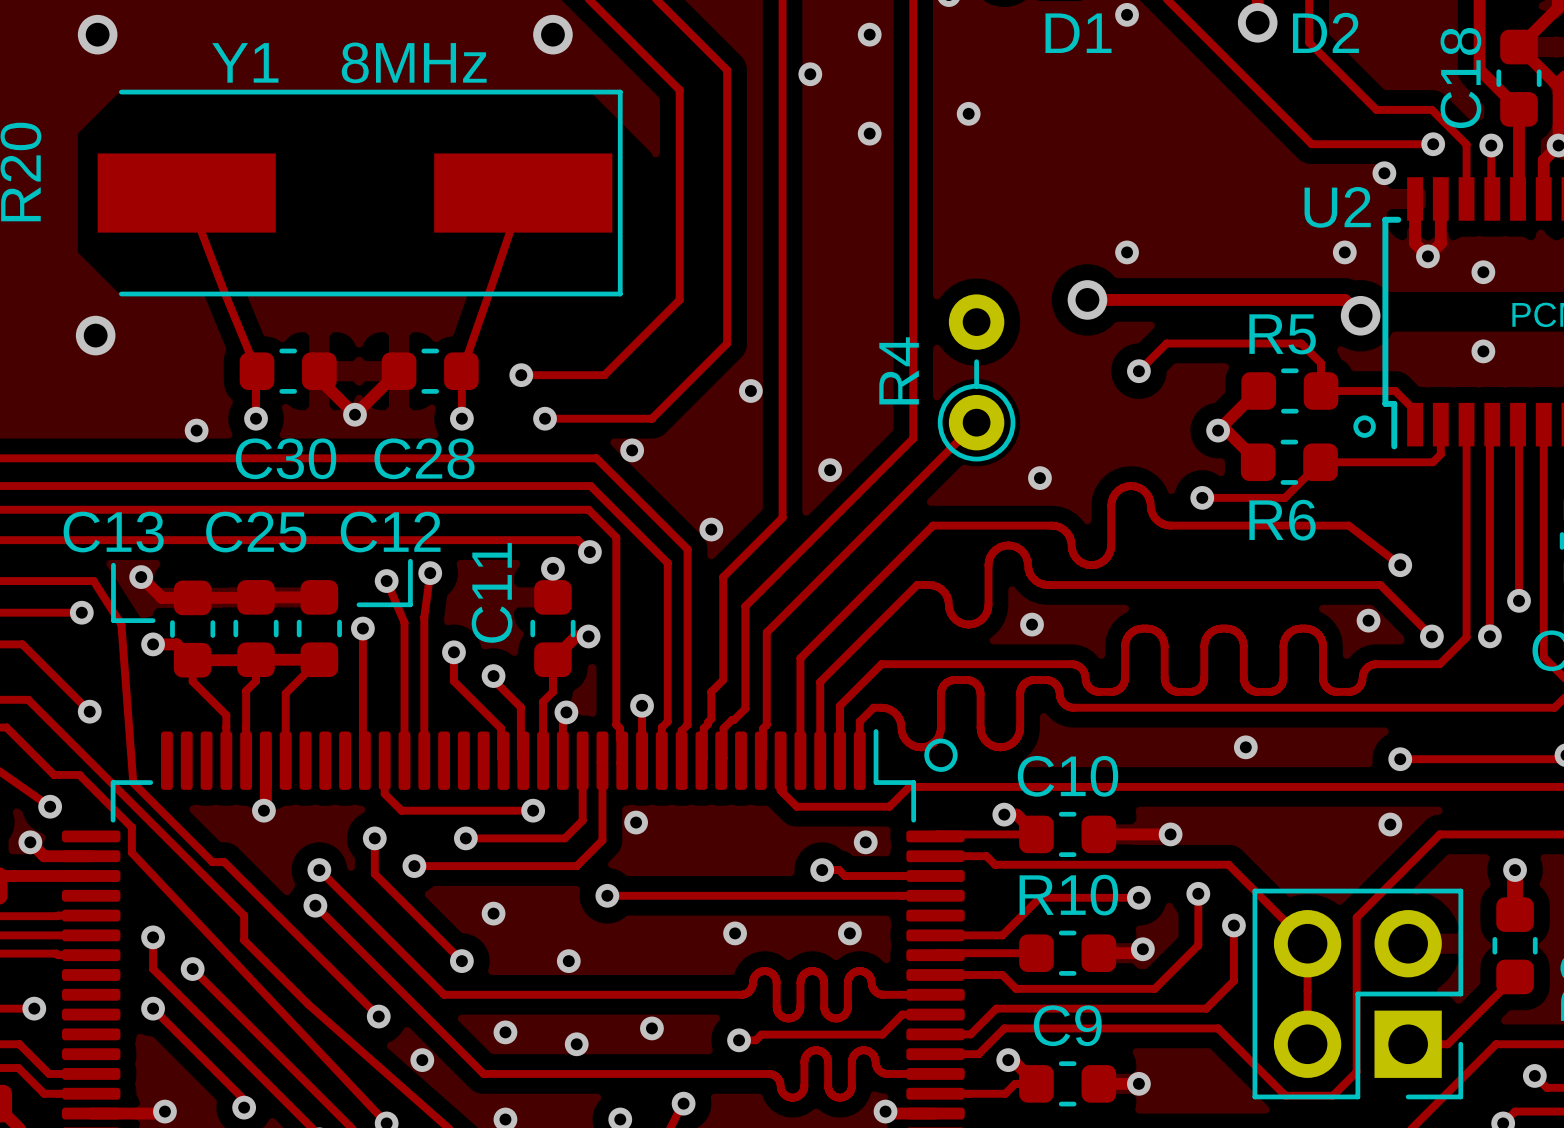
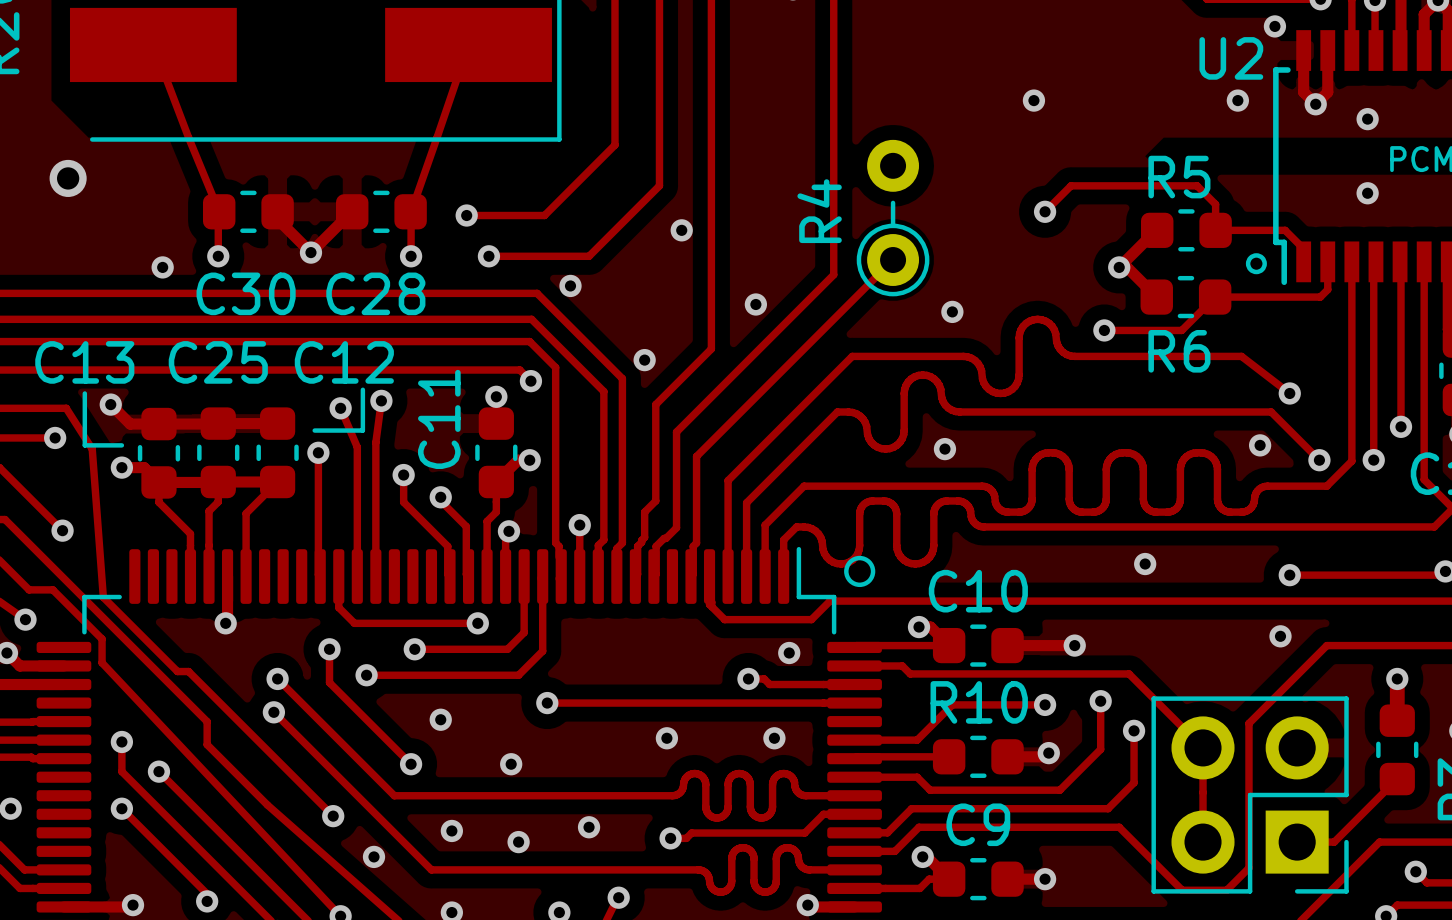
track: (1087, 299) (1344, 299) (1360, 315) -> none
via: (1087, 299) -> none
via: (1360, 315) -> none
via: (636, 822) -> none

